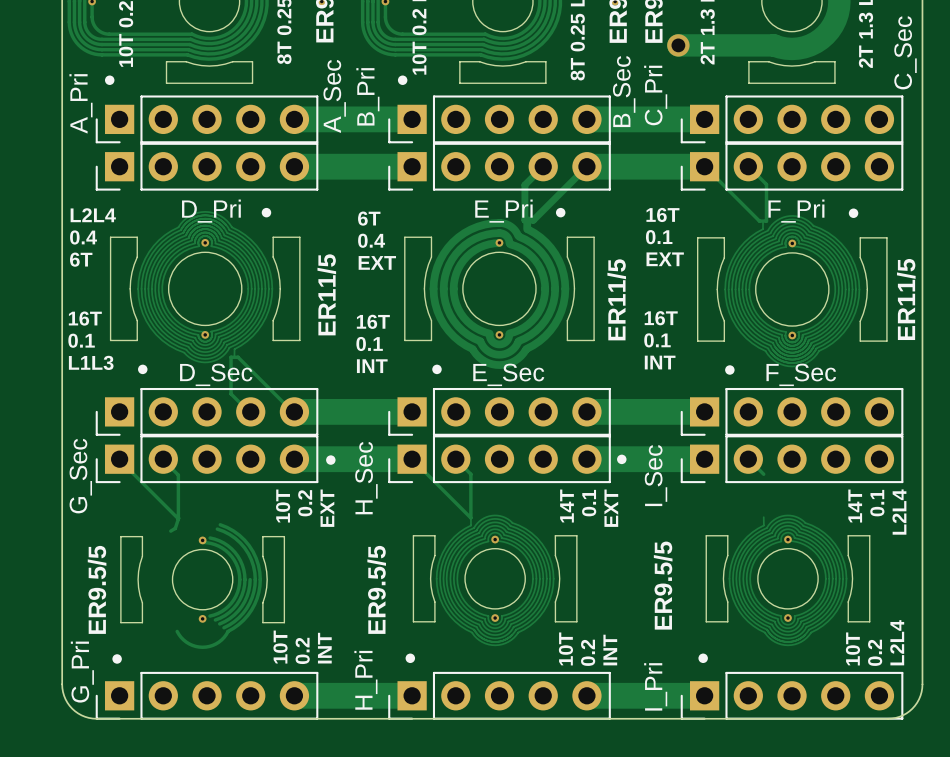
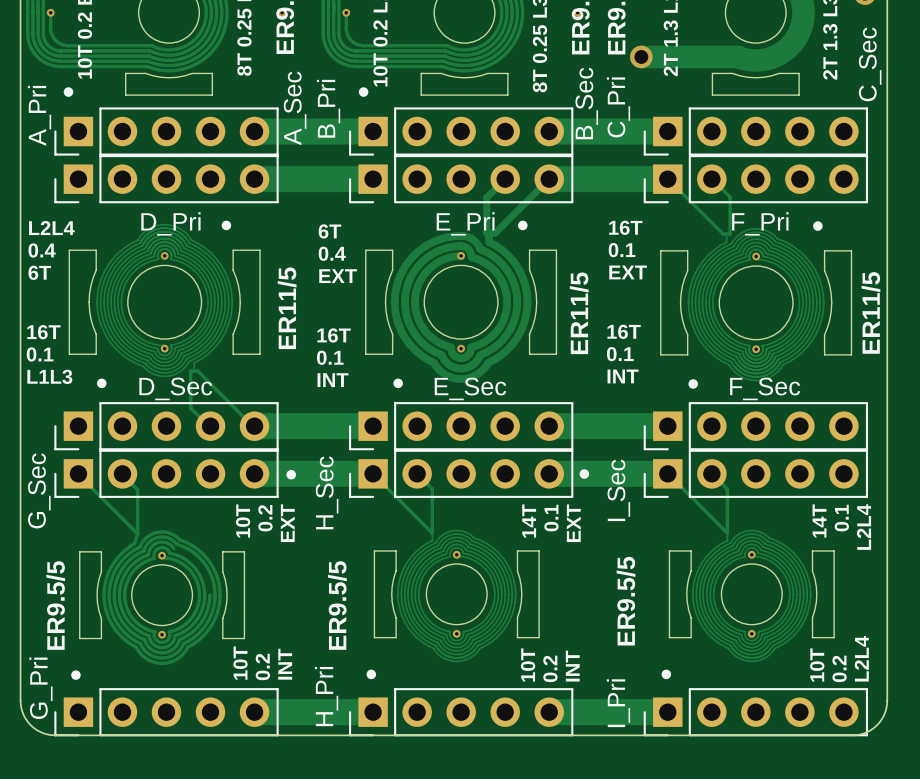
track: none -> (668, 473) (727, 533) (727, 489)
track: none -> (179, 539) (172, 534) (163, 532) (155, 533) (147, 537) (139, 546) (128, 554) (119, 563) (110, 582) (109, 595) (112, 615) (119, 626) (129, 636) (140, 643) (150, 654) (158, 657) (170, 656) (178, 651) (183, 643)
track: none -> (176, 544) (169, 538) (162, 537) (150, 541) (144, 550) (134, 556) (122, 568) (115, 584) (114, 595) (117, 612) (122, 622) (130, 630) (144, 639) (151, 649) (159, 652) (168, 651) (176, 646) (179, 640)
track: none -> (130, 546) (115, 560) (108, 572) (104, 585) (104, 598) (106, 612) (111, 624) (120, 635) (136, 647)
track: none -> (173, 548) (163, 542) (154, 544) (148, 554) (130, 566) (120, 584) (119, 600) (124, 616) (135, 628) (149, 635)
track: none -> (169, 552) (165, 548) (159, 547) (154, 551) (154, 557)
track: none -> (154, 558) (137, 566) (129, 577) (124, 590) (125, 604) (134, 620) (145, 628) (154, 631) (154, 637) (158, 641) (166, 641) (169, 637) (169, 632)
track: none -> (149, 635) (153, 644) (161, 647) (170, 644) (175, 636)

